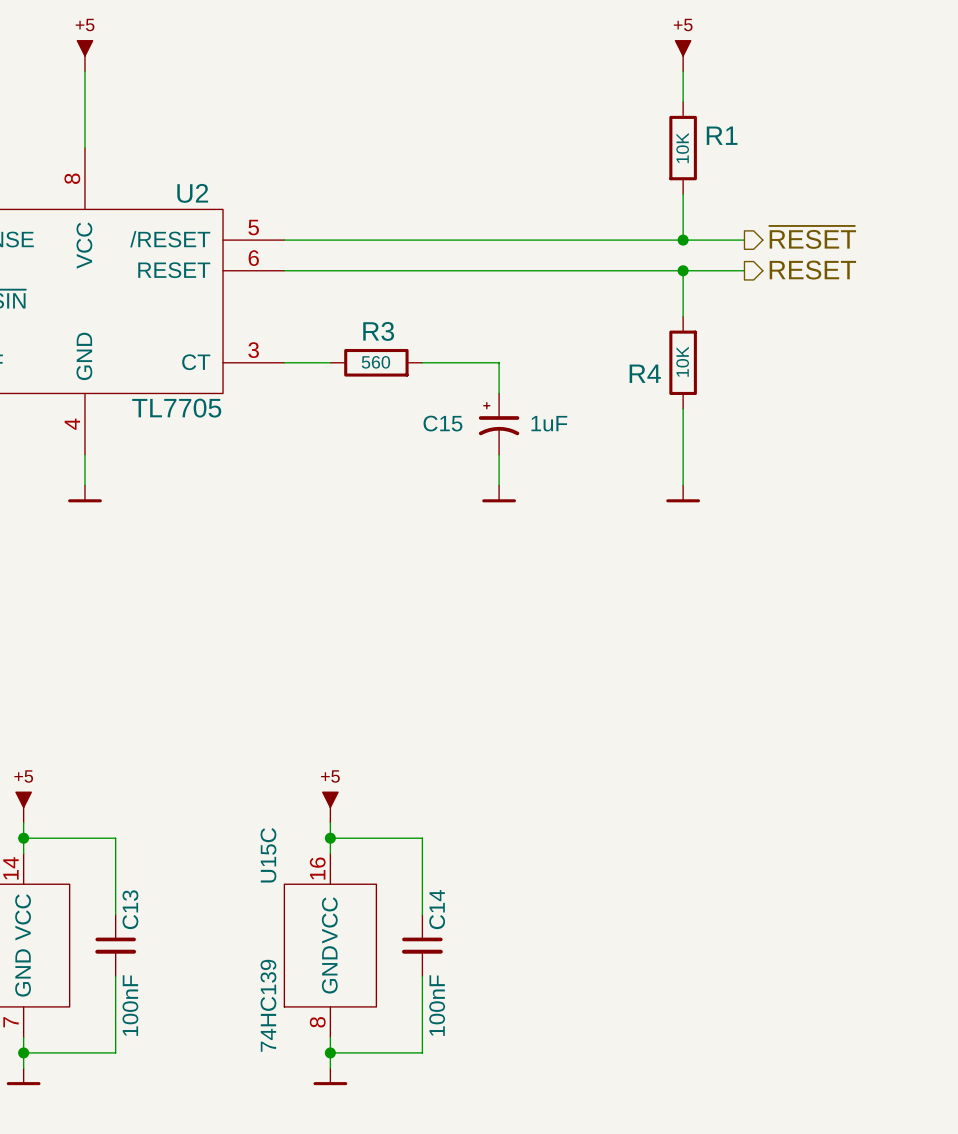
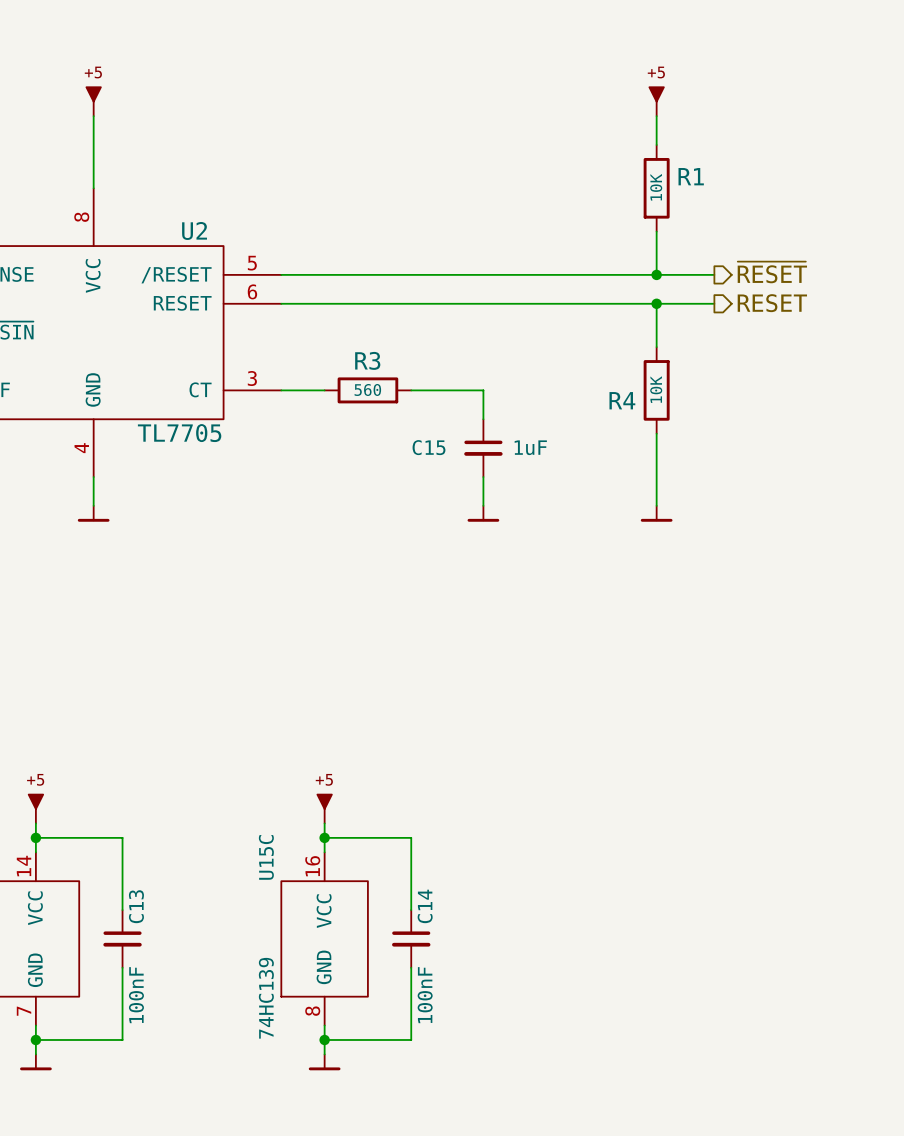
C15 symbol: [478, 393, 520, 455] -> [464, 419, 503, 478]

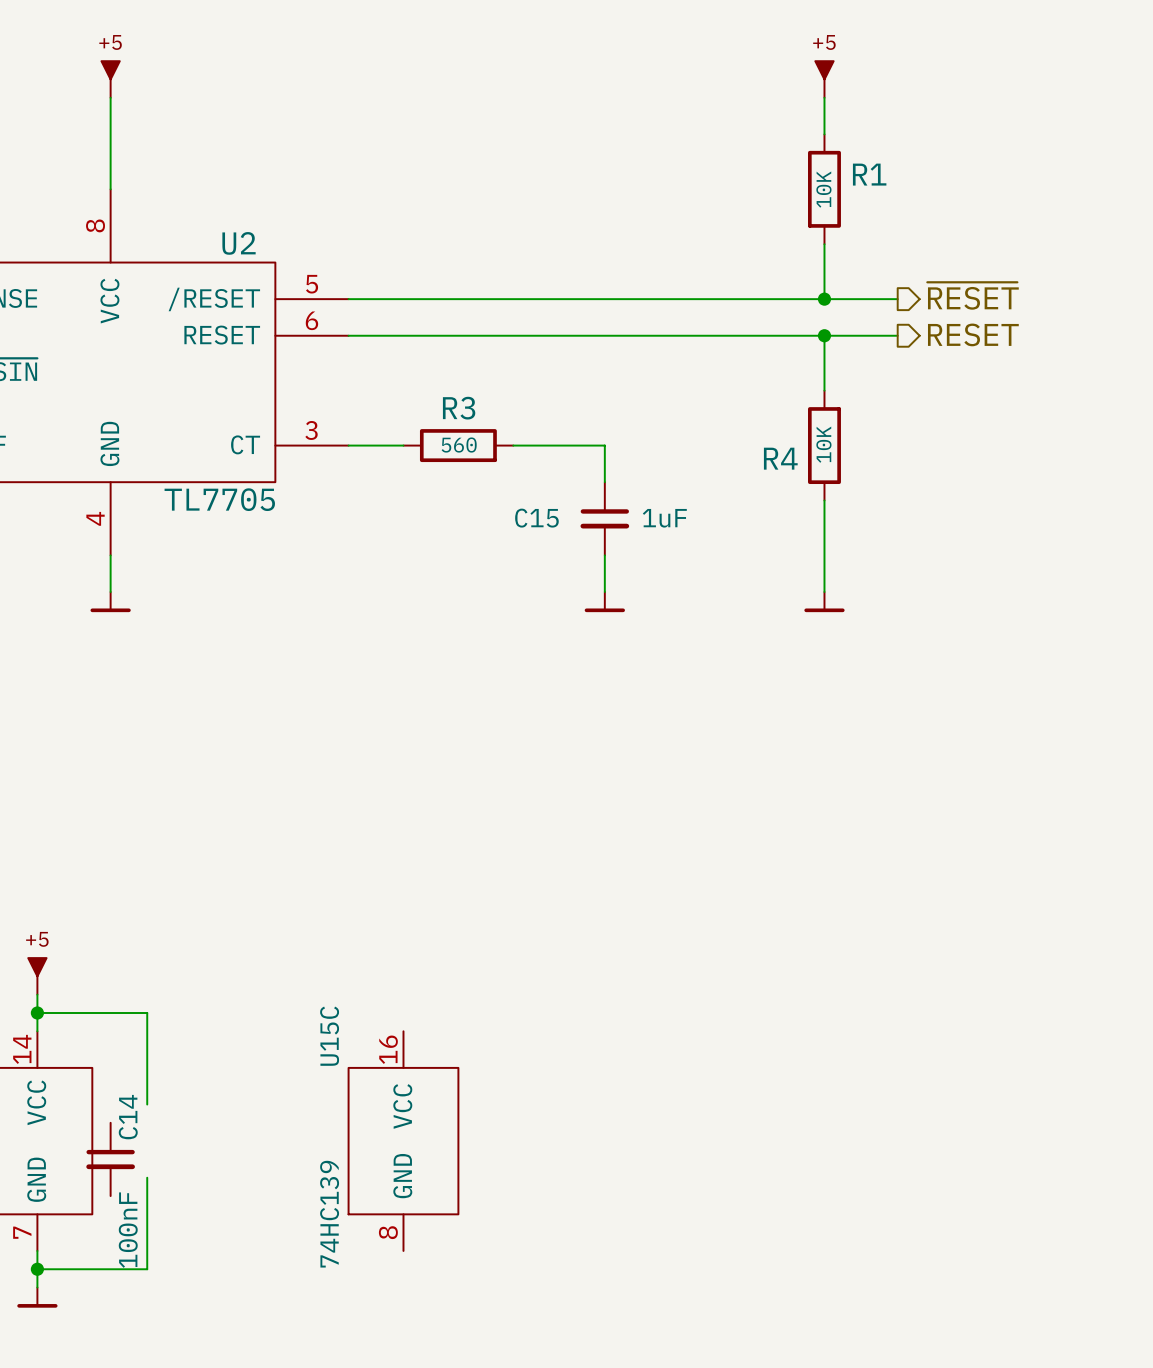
power symbol: (324, 809) -> none
wire: (324, 823) (324, 852) -> none
wire: (324, 837) (411, 837) (411, 910) -> none
junction: (324, 837) -> none
C13: 100nF (122, 938) -> none
C14 position: (411, 938) -> (110, 1159)
wire: (411, 967) (411, 1039) (324, 1039) -> none
wire: (324, 1025) (324, 1054) -> none
junction: (324, 1039) -> none
power symbol: (324, 1062) -> none

